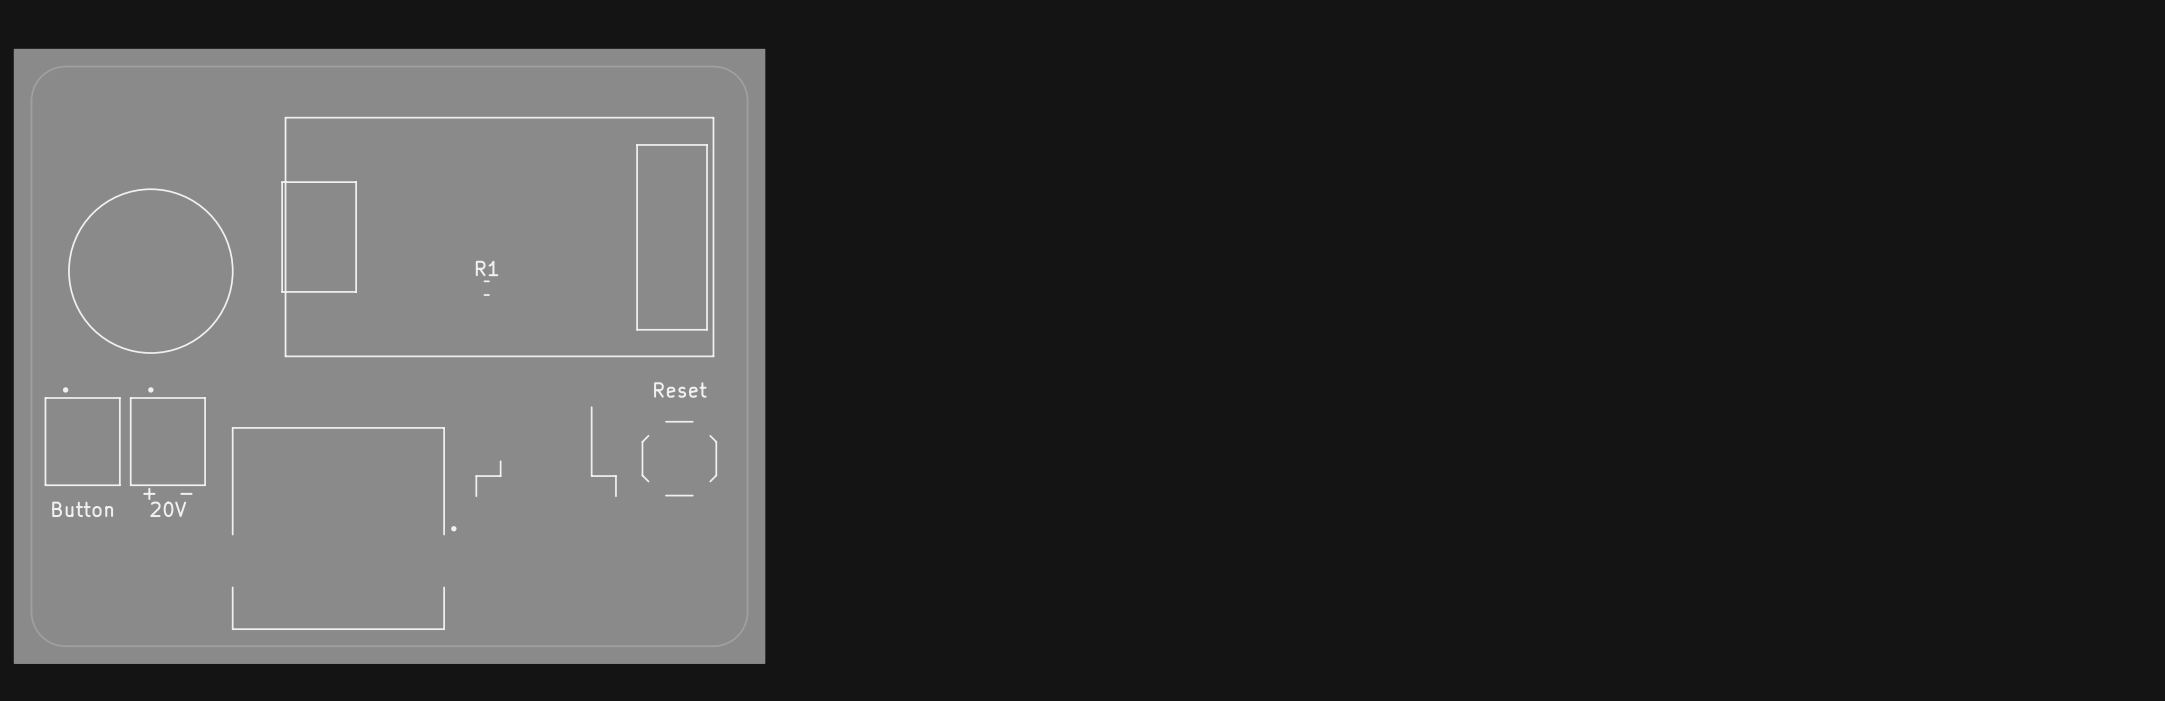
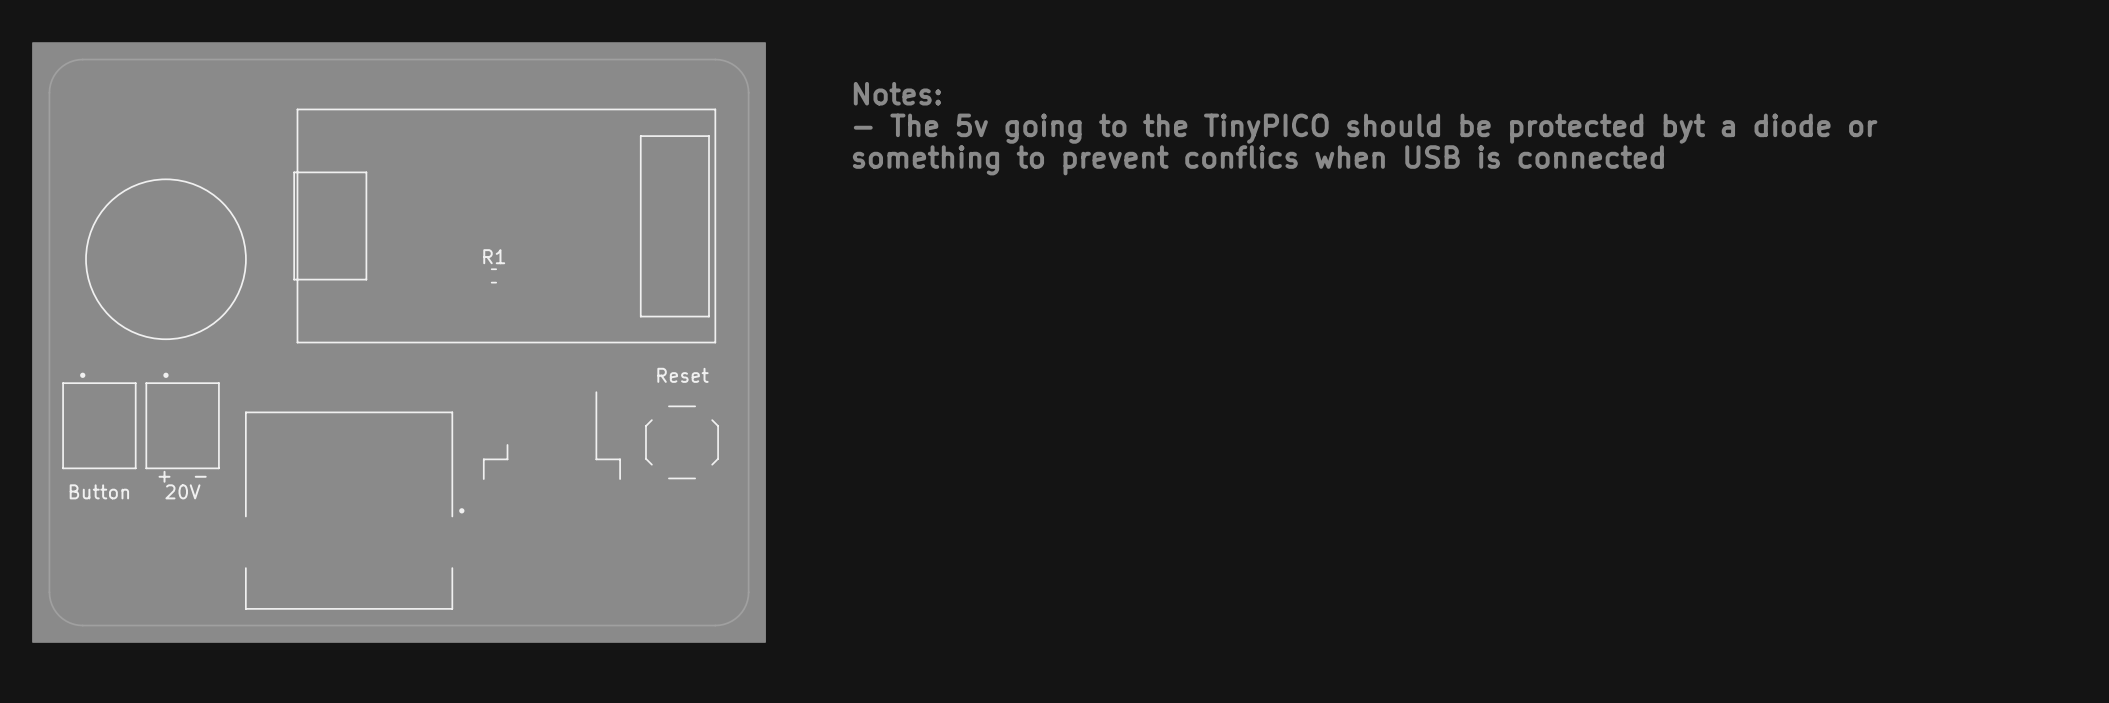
text: none -> Notes: (897, 93)
text: none -> - The 5v going to the TinyPICO should be protected byt a diode or (1365, 128)
text: none -> something to prevent conflics when USB is connected (1258, 160)

